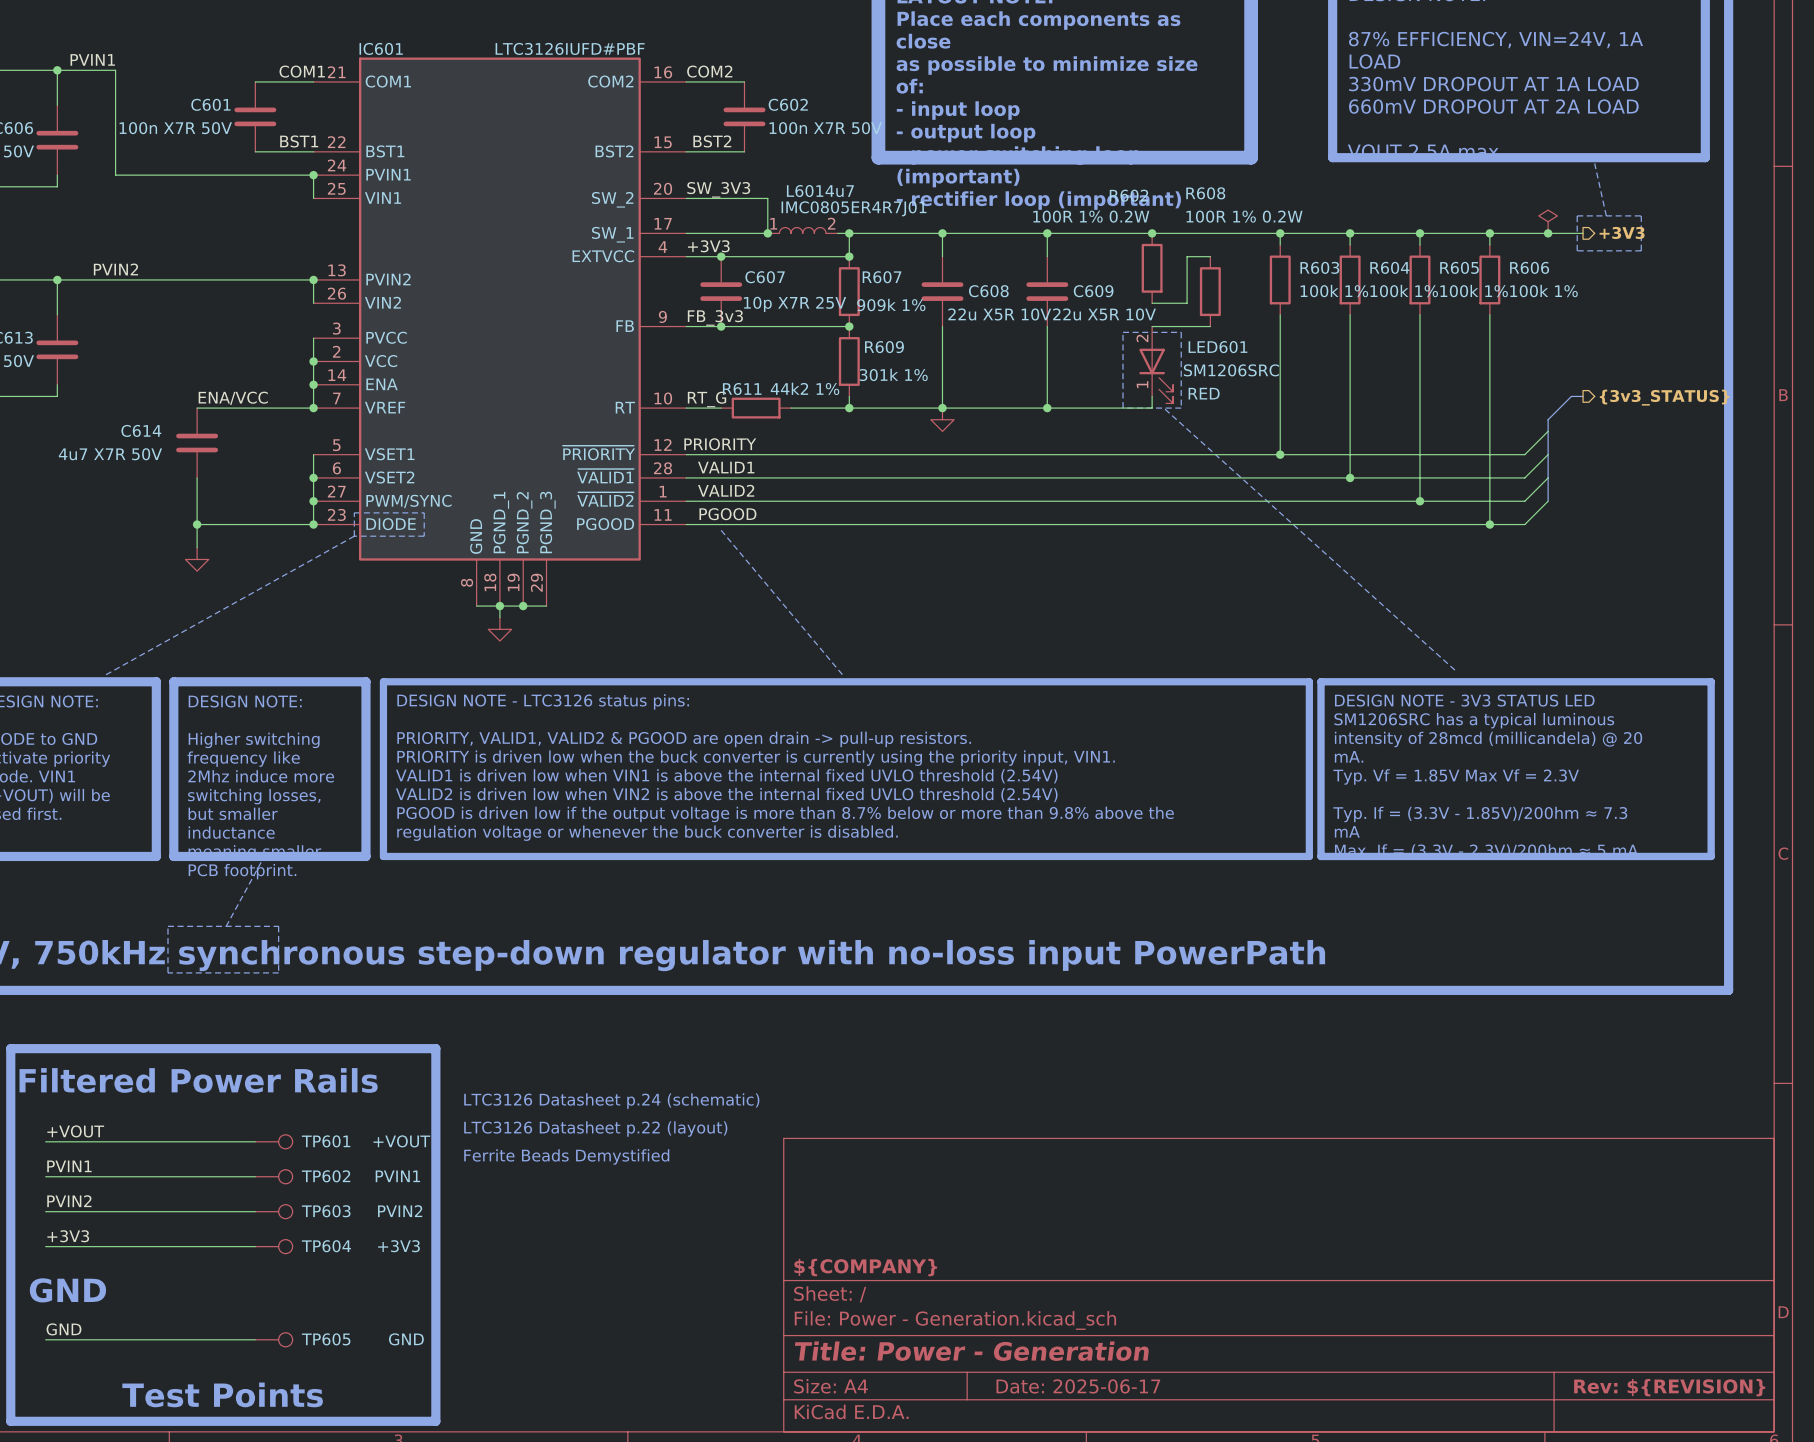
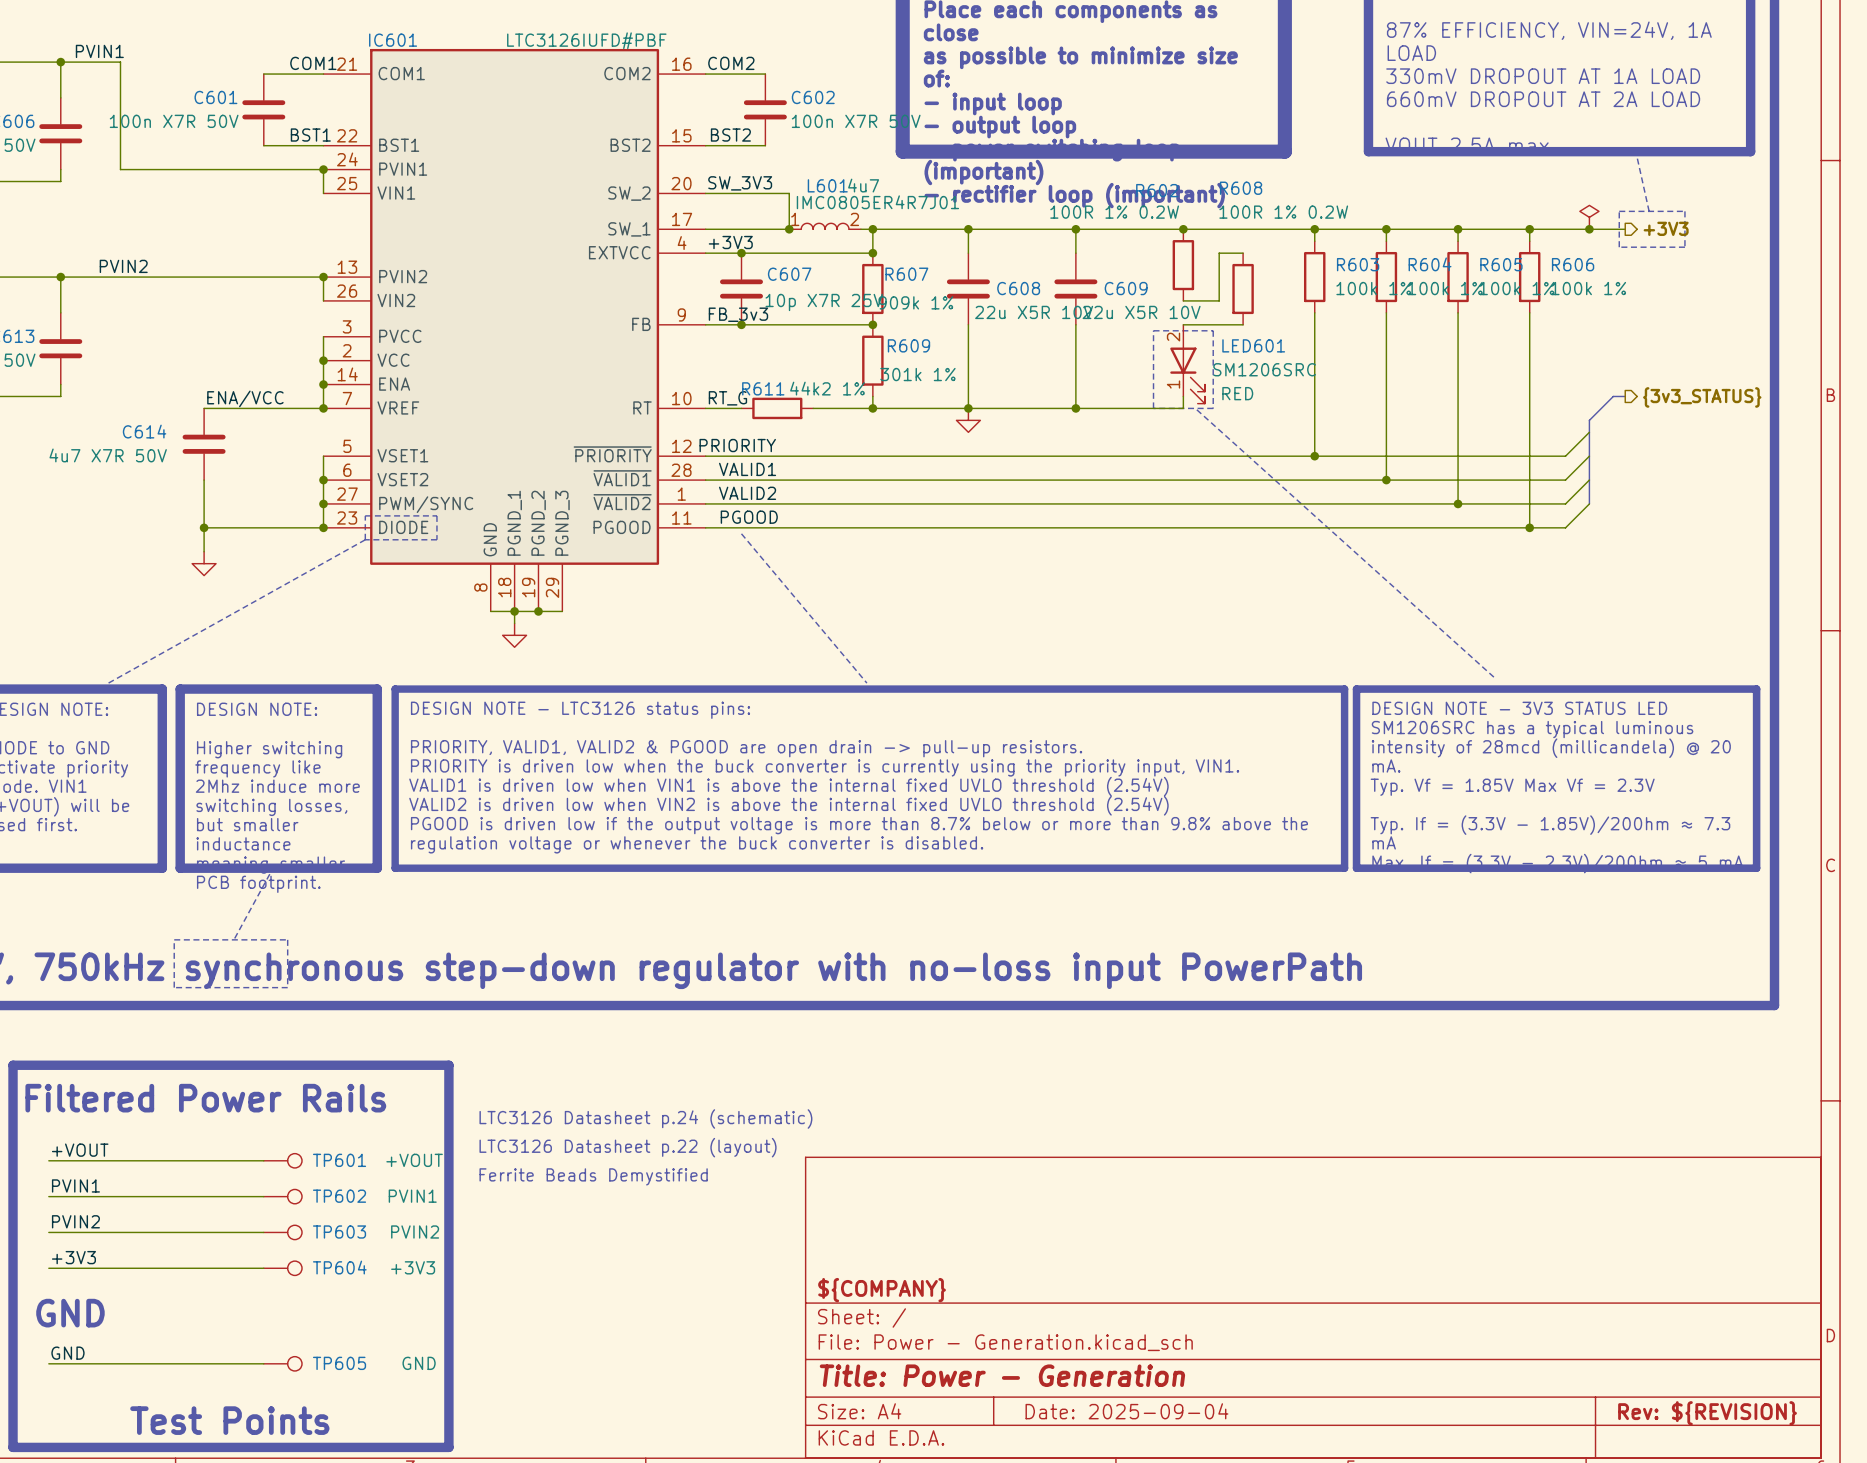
title block: Date: 2025-06-17 (1078, 1386) -> Date: 2025-09-04 (1126, 1411)

